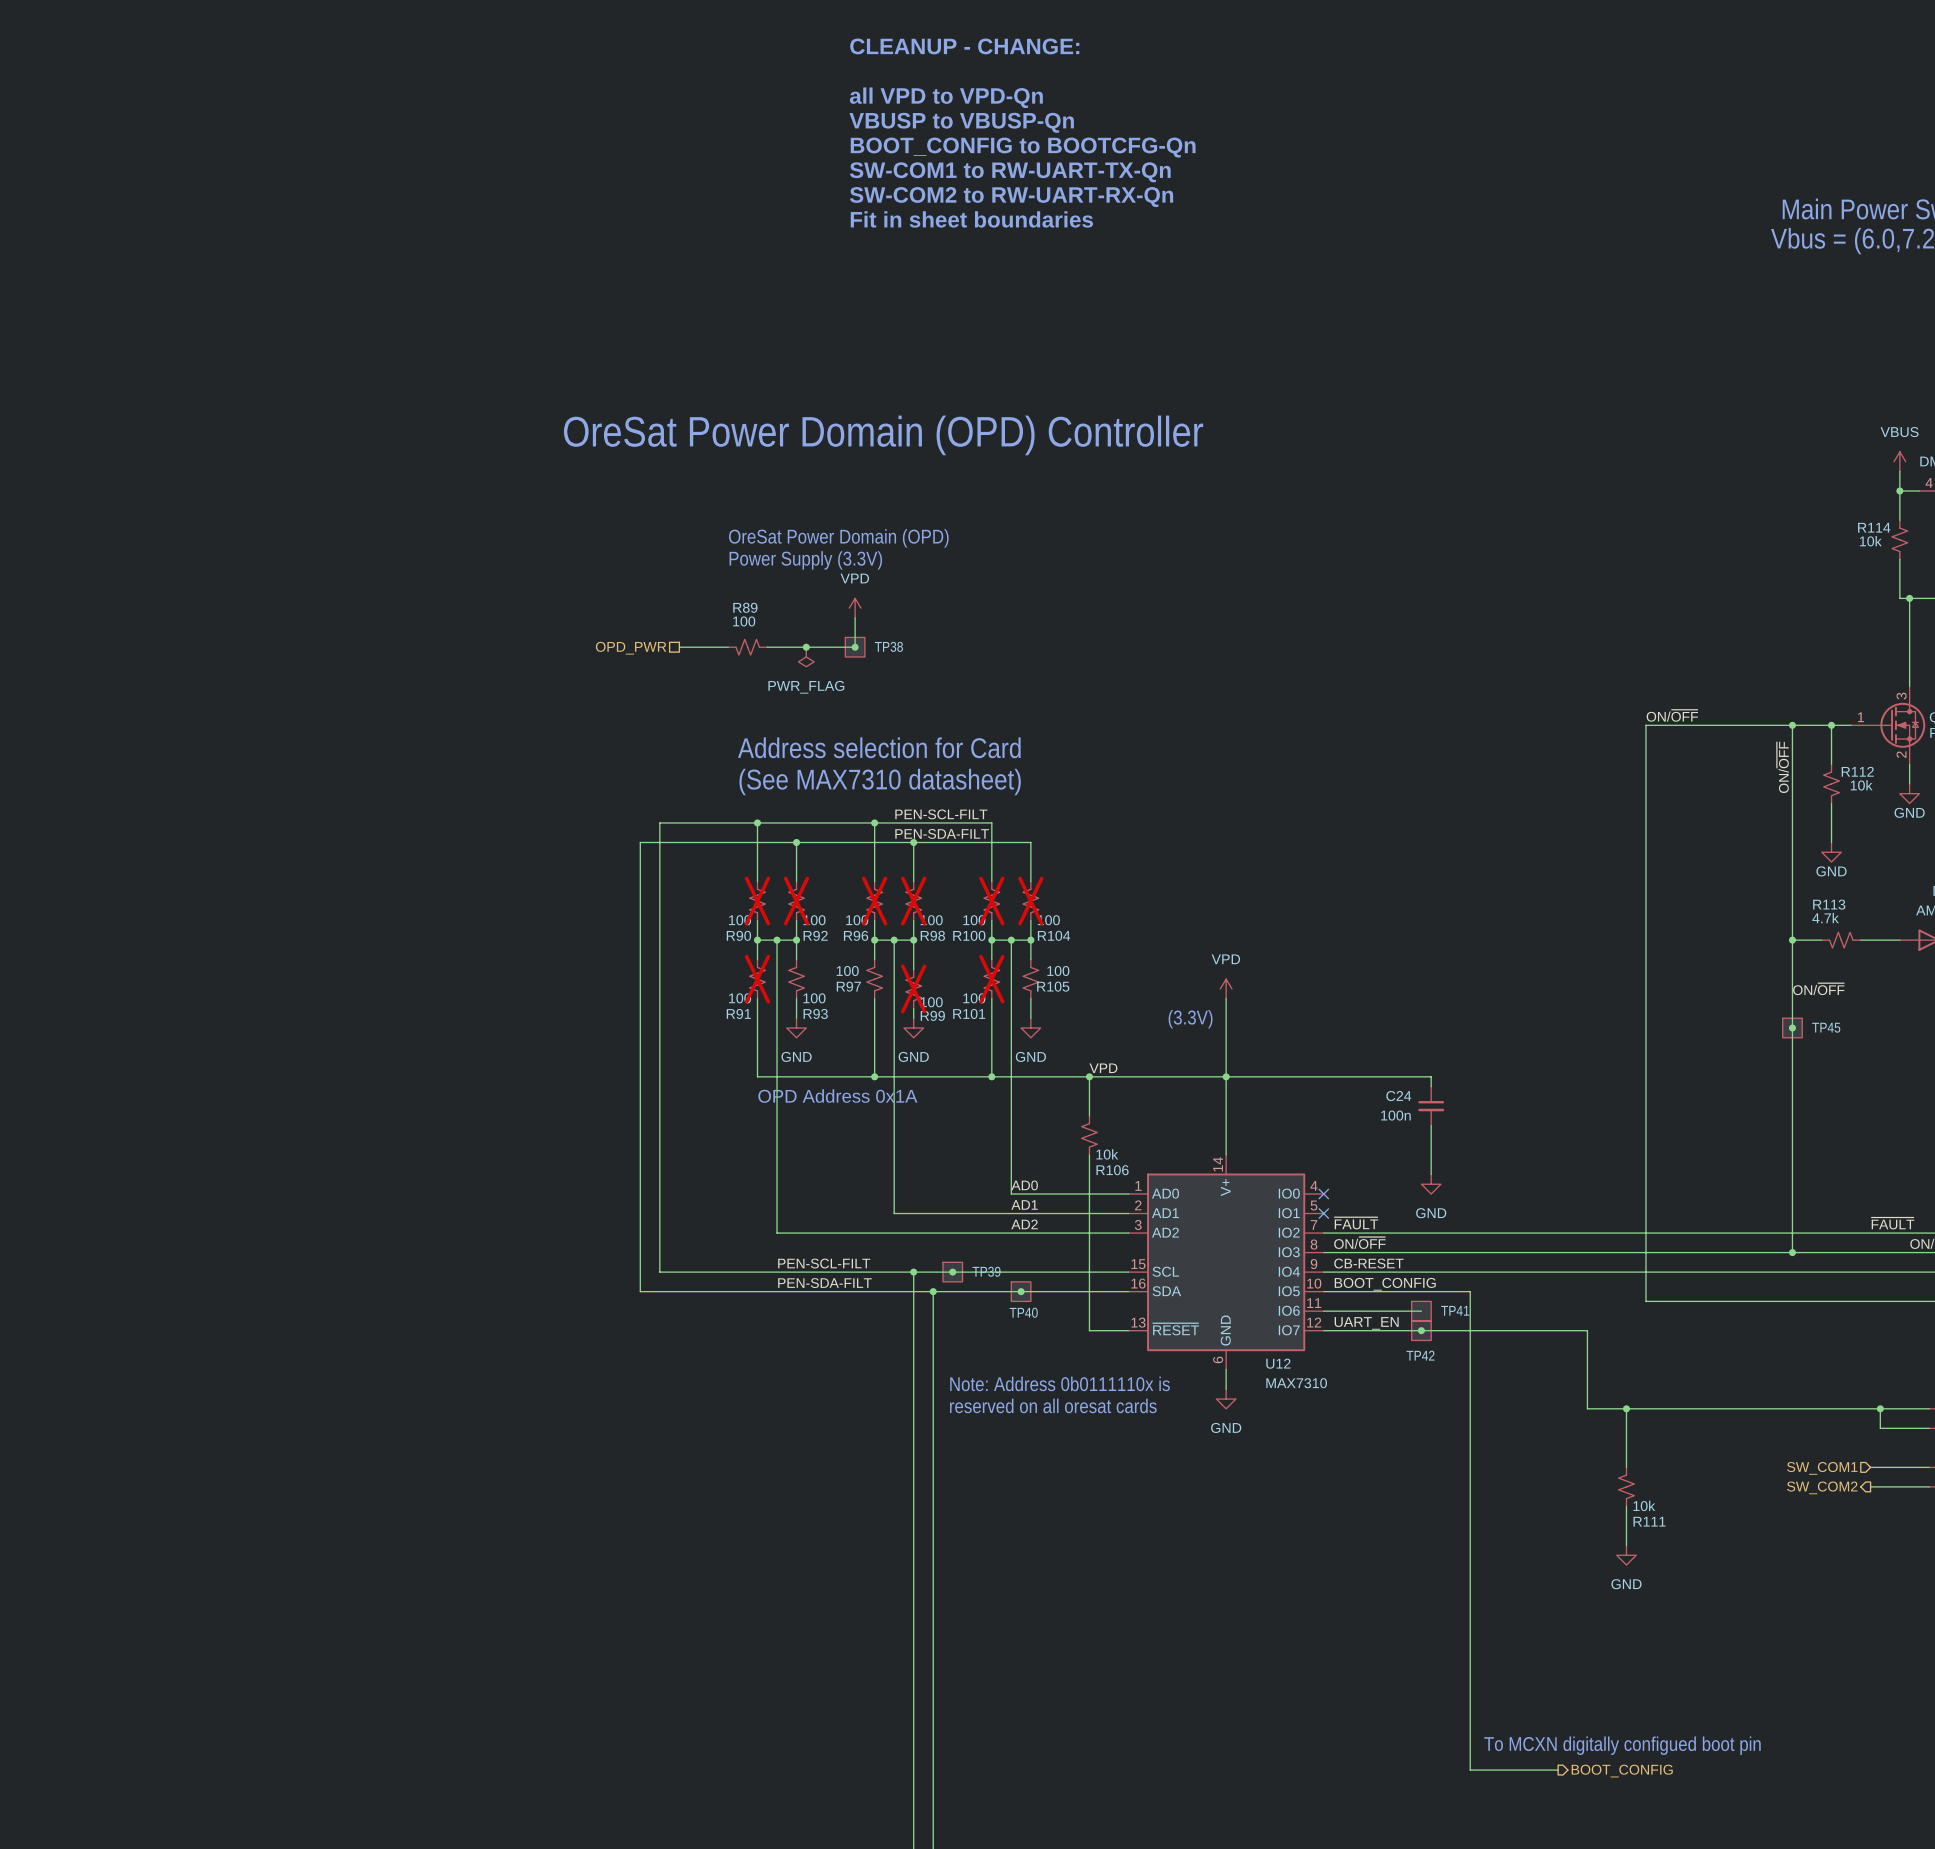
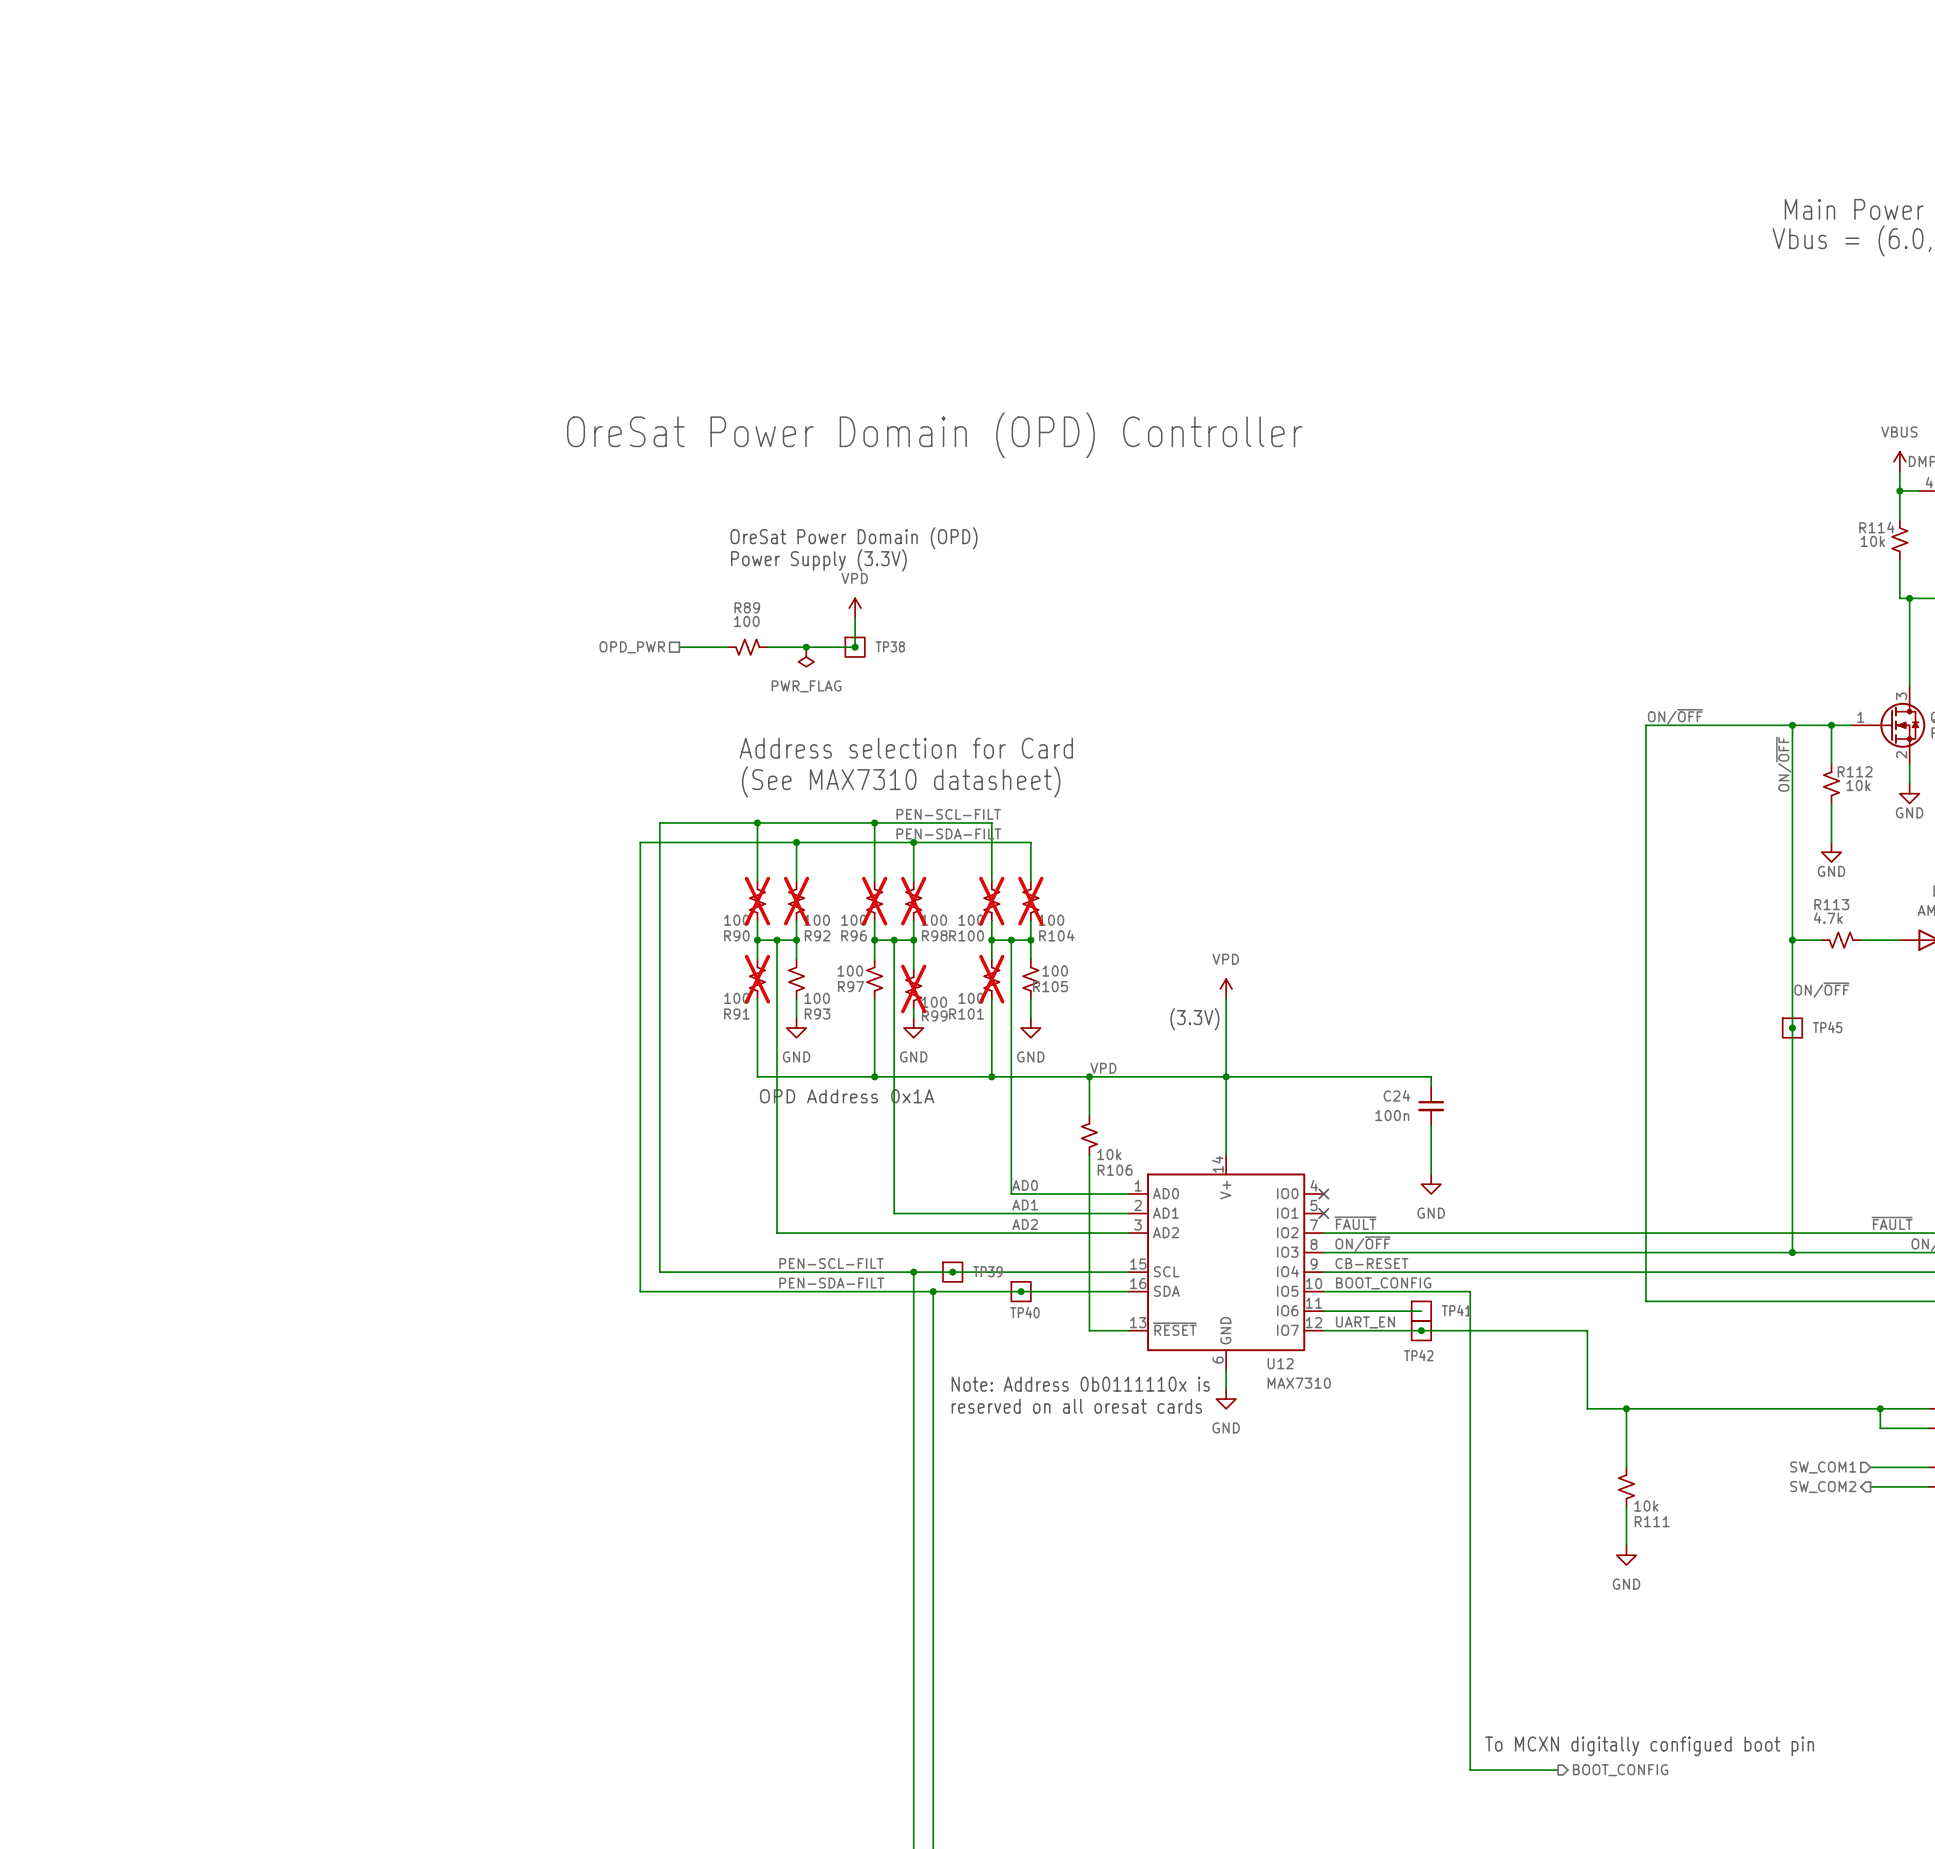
text: CLEANUP - CHANGE: (964, 46) -> none
text: all VPD to VPD-Qn (946, 97) -> none
text: VBUSP to VBUSP-Qn (961, 122) -> none
text: BOOT_CONFIG to BOOTCFG-Qn (1023, 147) -> none
text: SW-COM1 to RW-UART-TX-Qn (1010, 172) -> none
text: SW-COM2 to RW-UART-RX-Qn (1011, 197) -> none
text: Fit in sheet boundaries (971, 219) -> none

